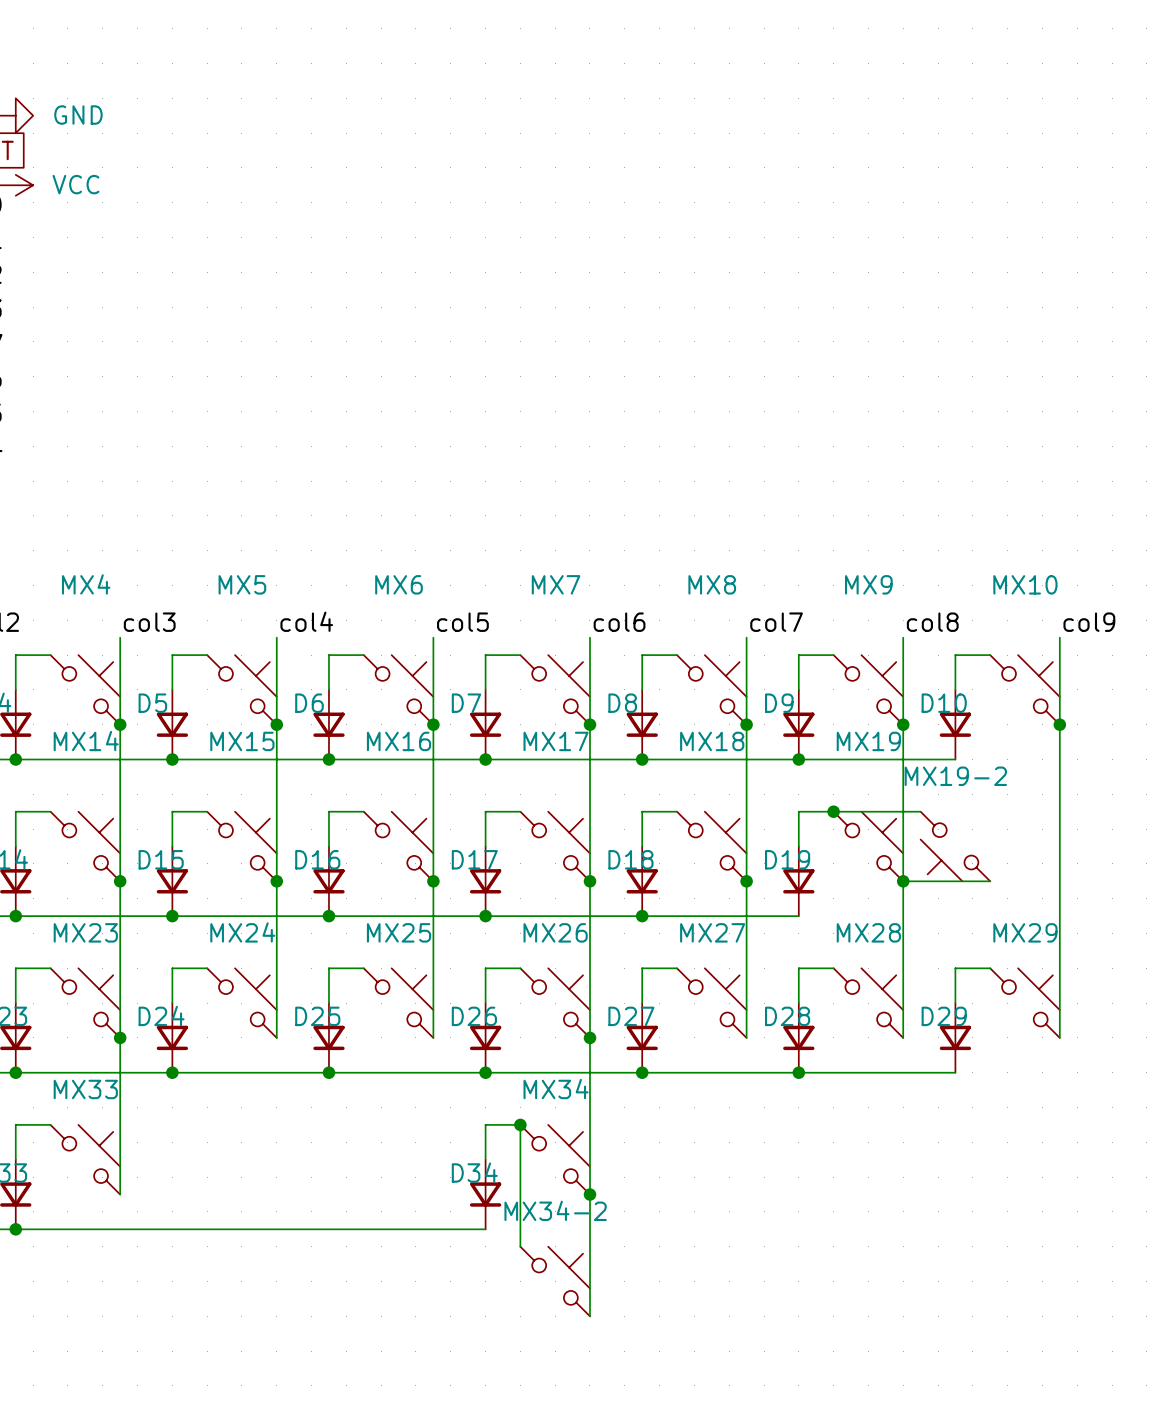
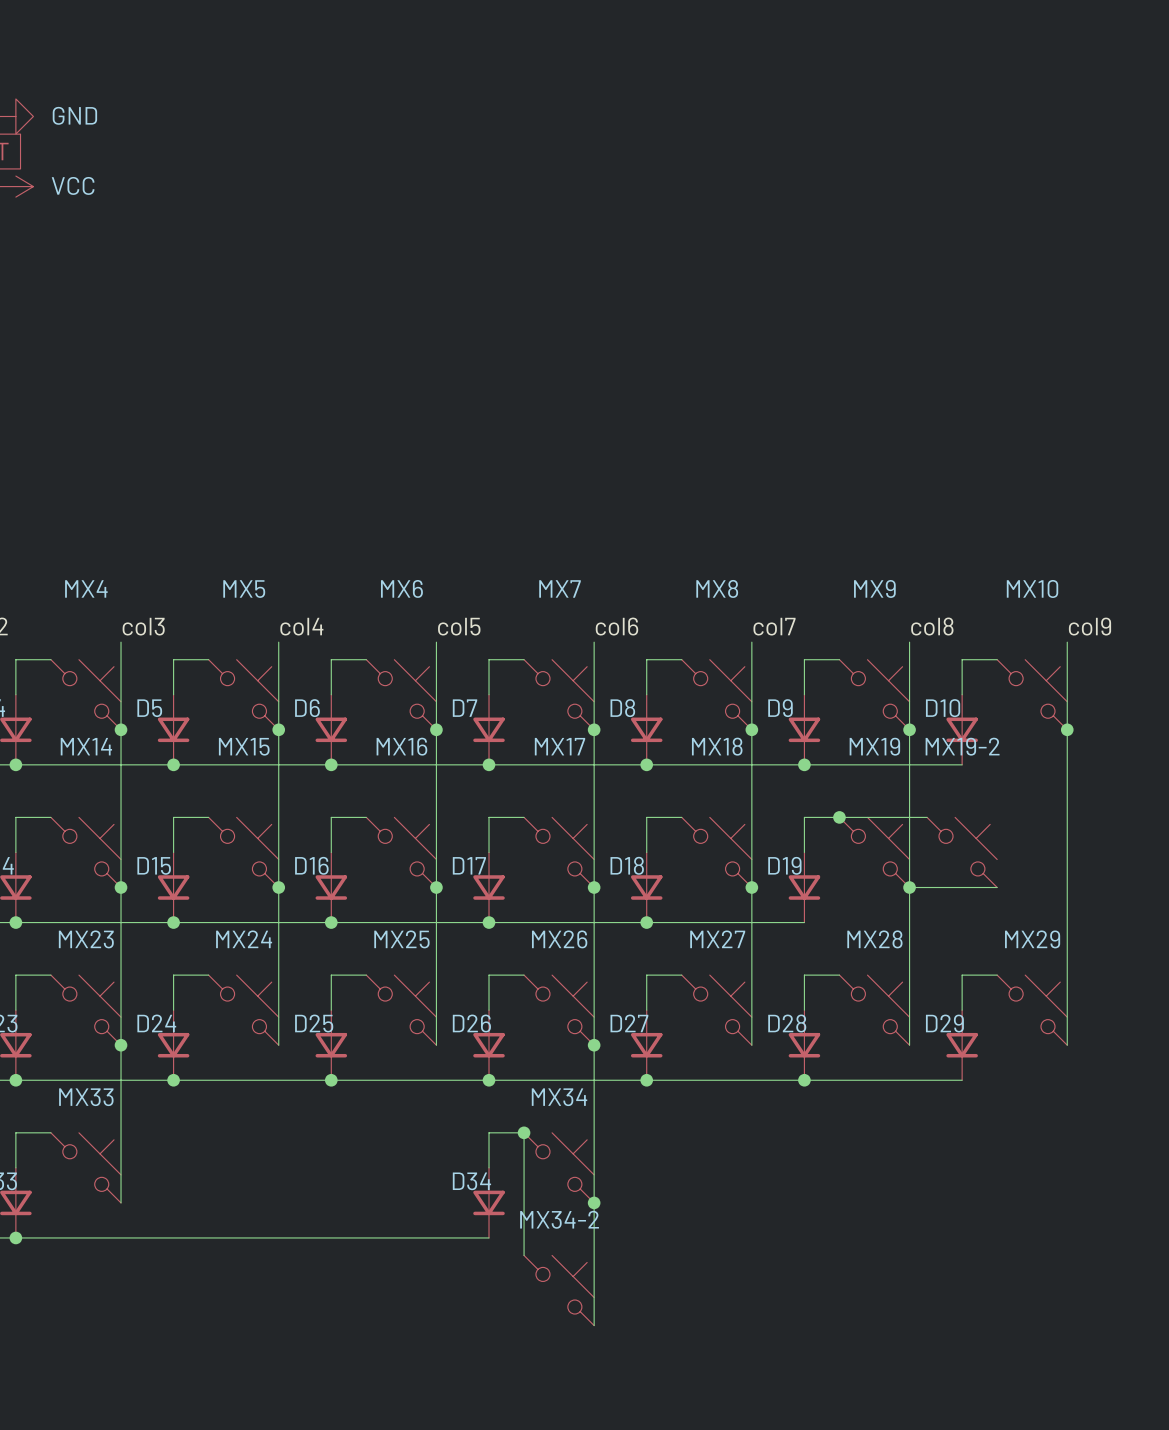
MX19-2 name position: MX19-2 (955, 776) -> MX19-2 (962, 746)
MX19-2 rotation: 0° (955, 846) -> 180° (962, 852)

